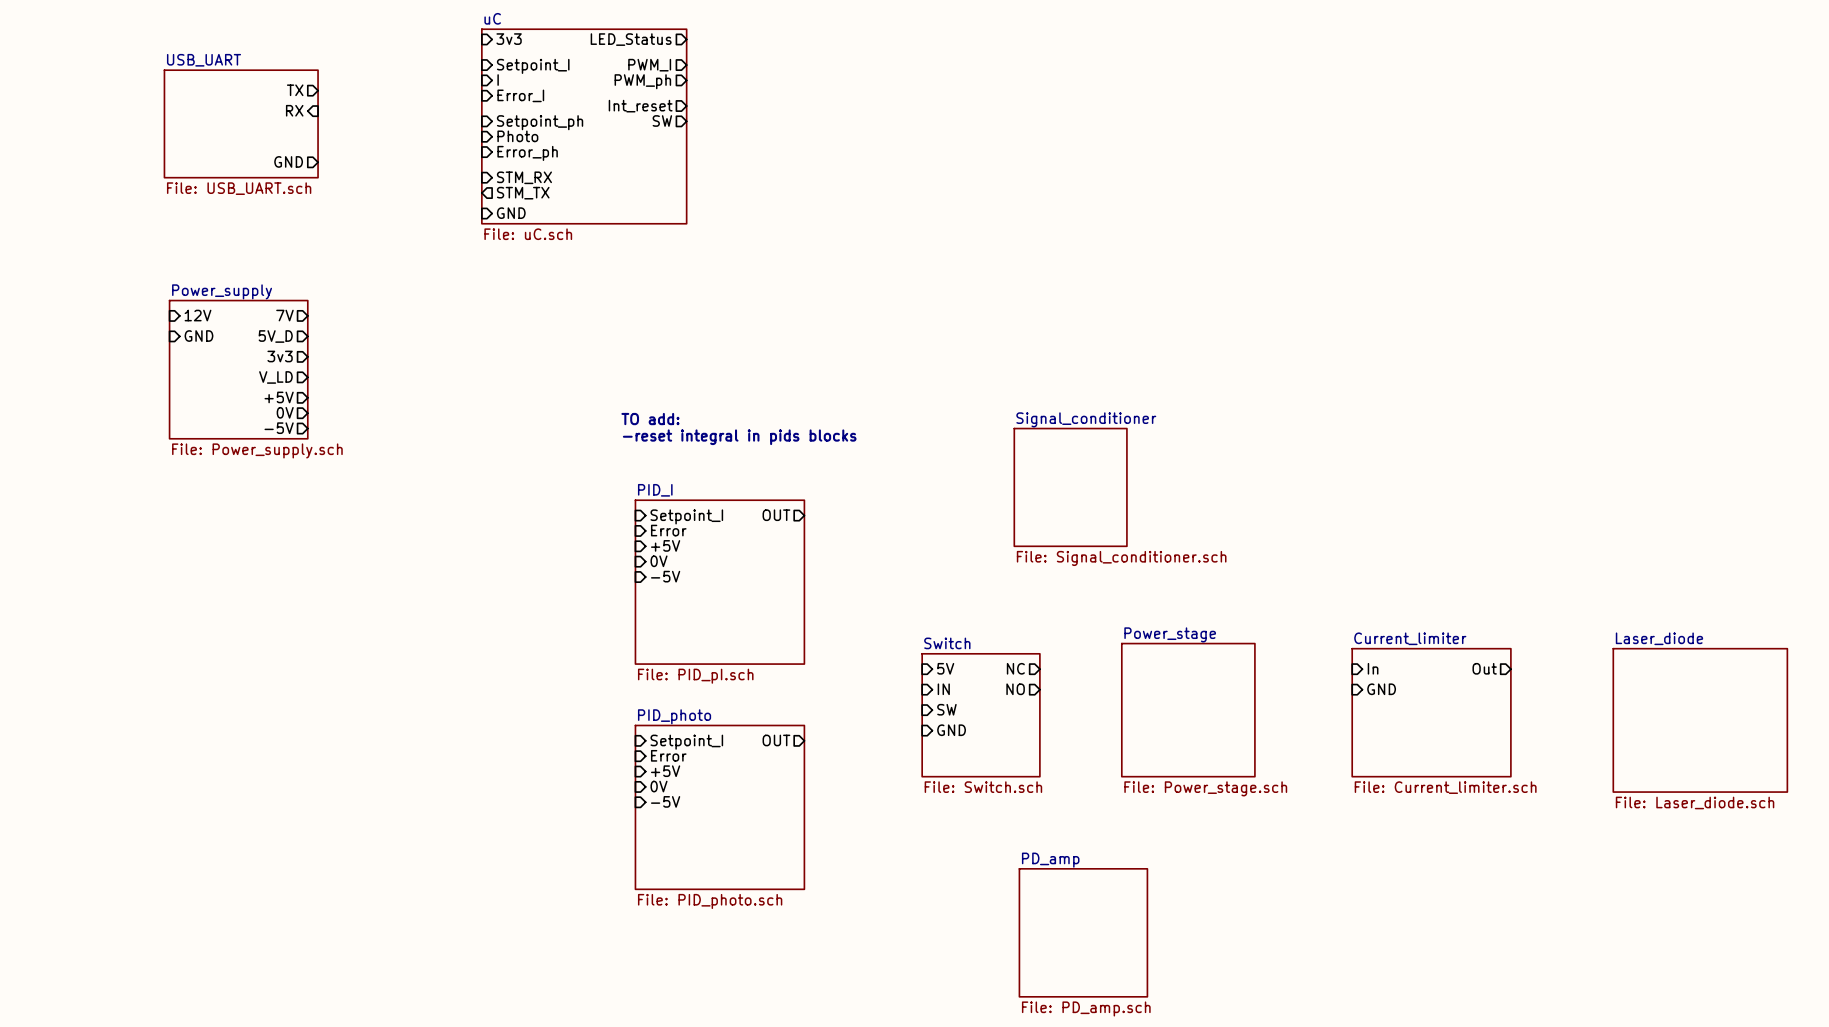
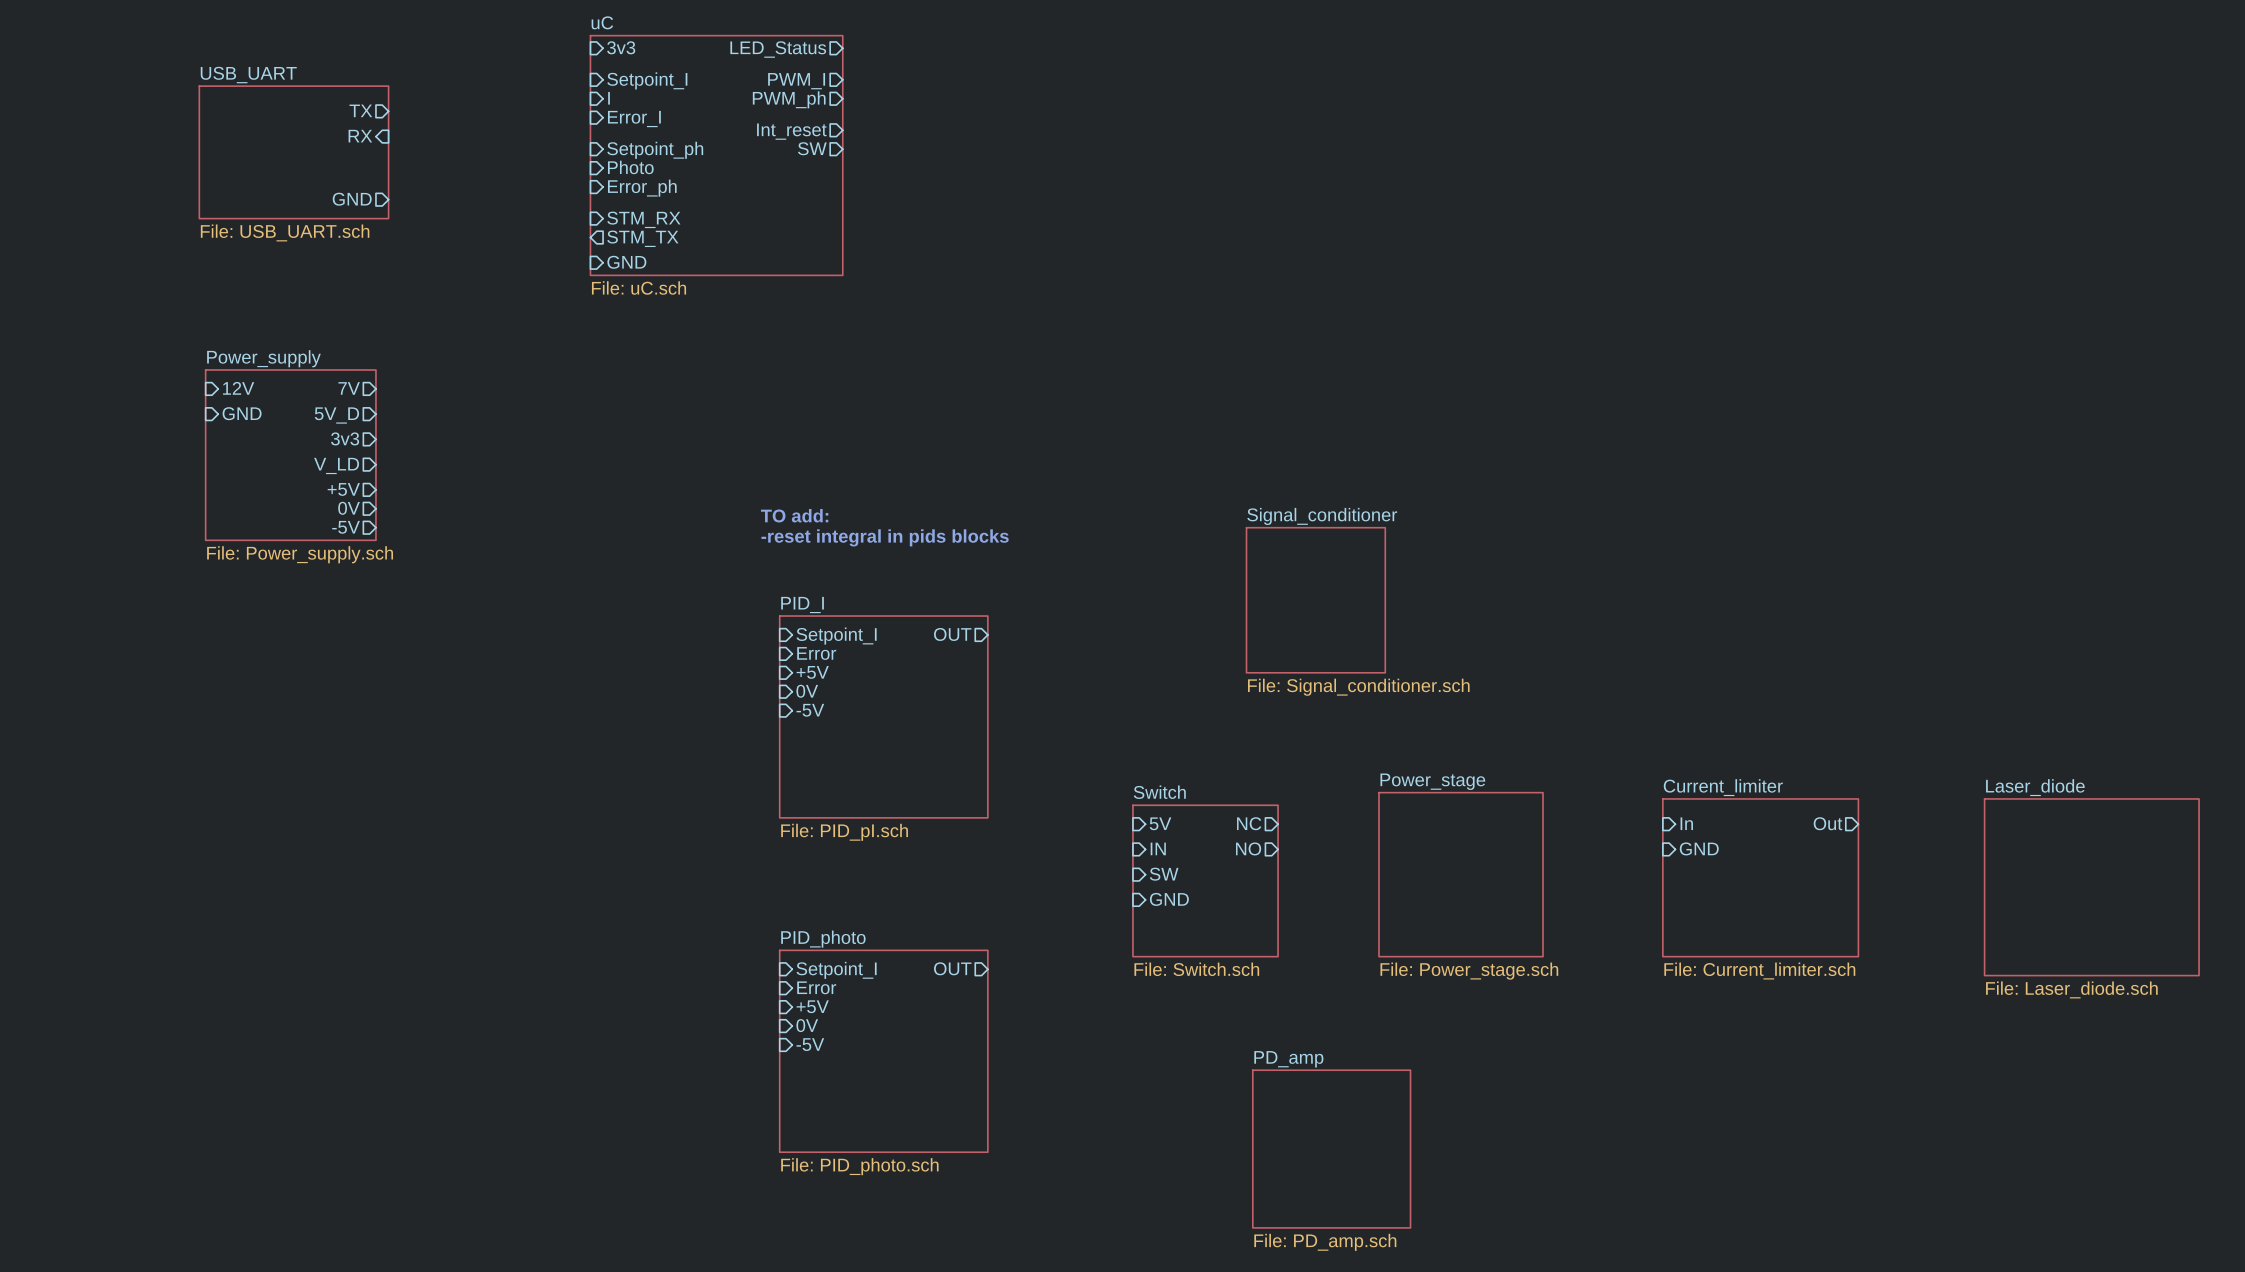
sheet pin position: OUT (776, 740) -> OUT (952, 968)
sheet pin: Setpoint_I (686, 742) -> none
sheet pin: Error (668, 755) -> none
sheet pin position: +5V (665, 771) -> +5V (812, 1006)
sheet pin: 0V (659, 786) -> Setpoint_I (836, 970)
sheet pin: -5V (665, 801) -> Error (816, 987)
sheet PID_photo position: (719, 807) -> (883, 1051)
sheet pin: none -> 0V (807, 1025)
sheet pin: none -> -5V (810, 1044)

